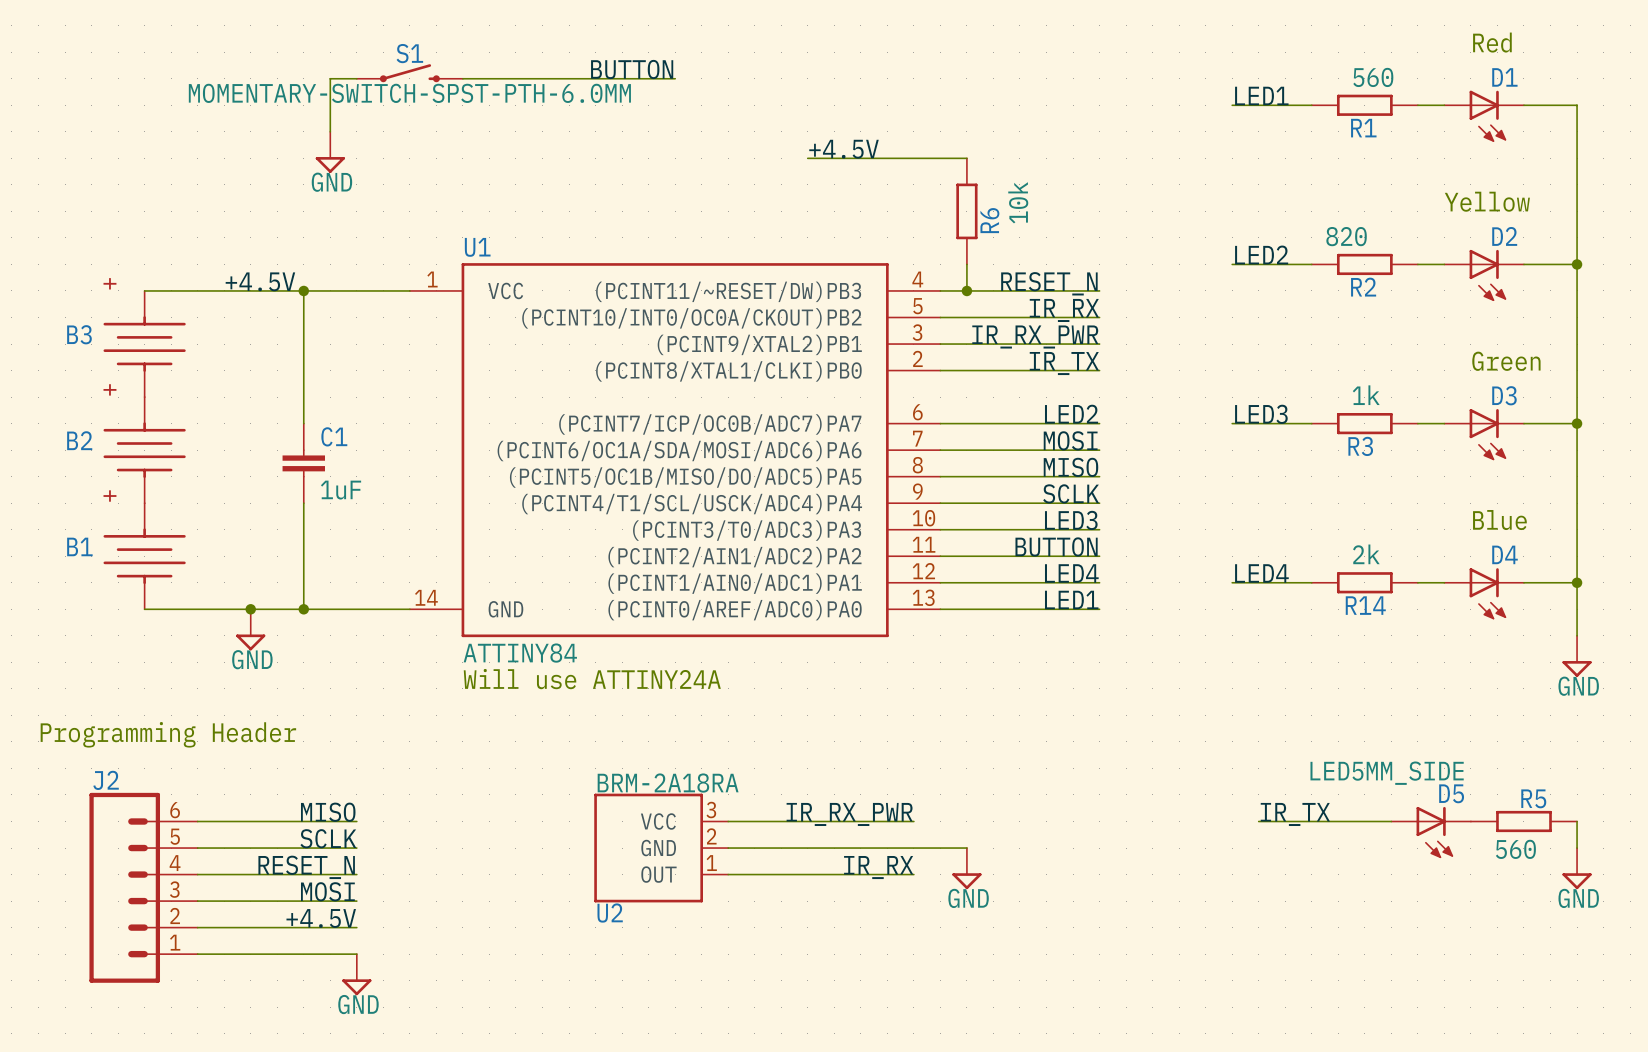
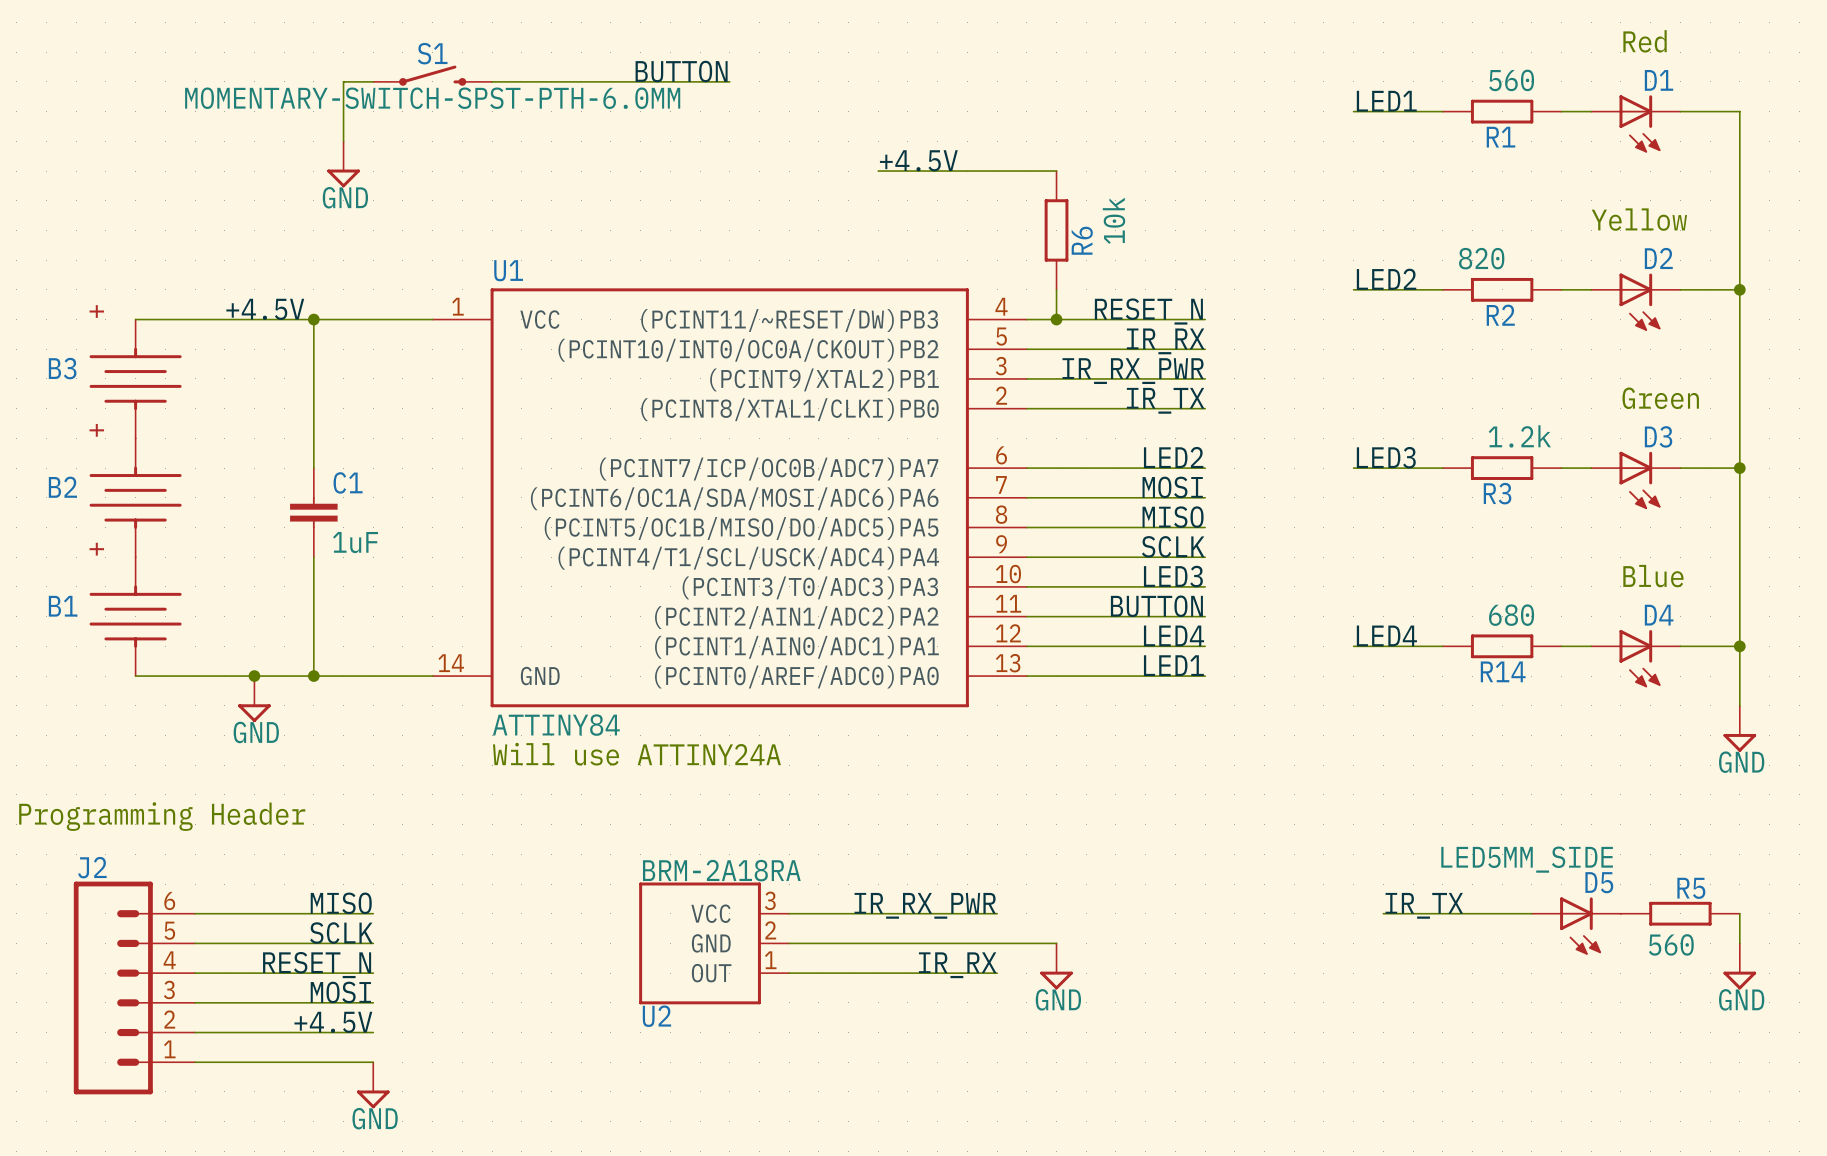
R3 value: 1k (1366, 395) -> 1.2k (1519, 436)
R14 value: 2k (1366, 554) -> 680 (1511, 615)

